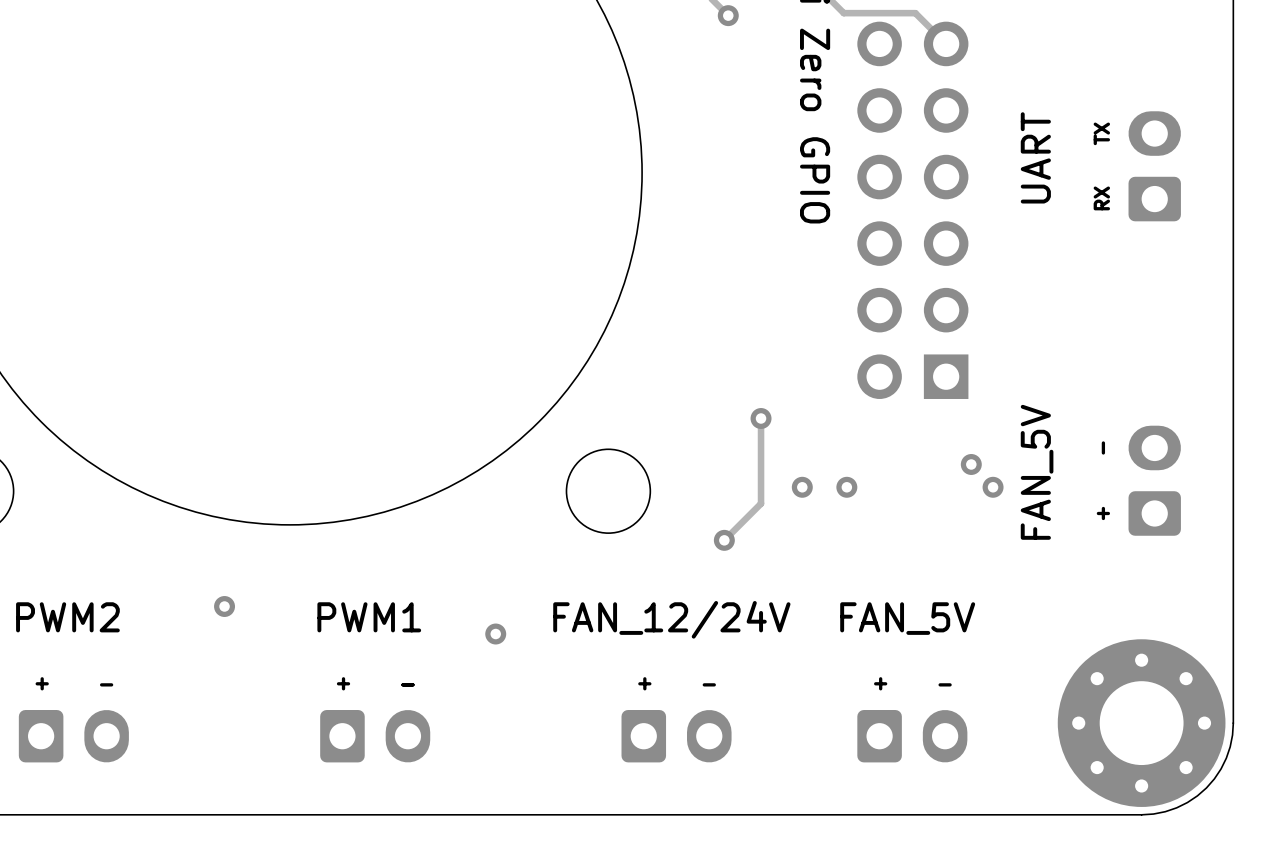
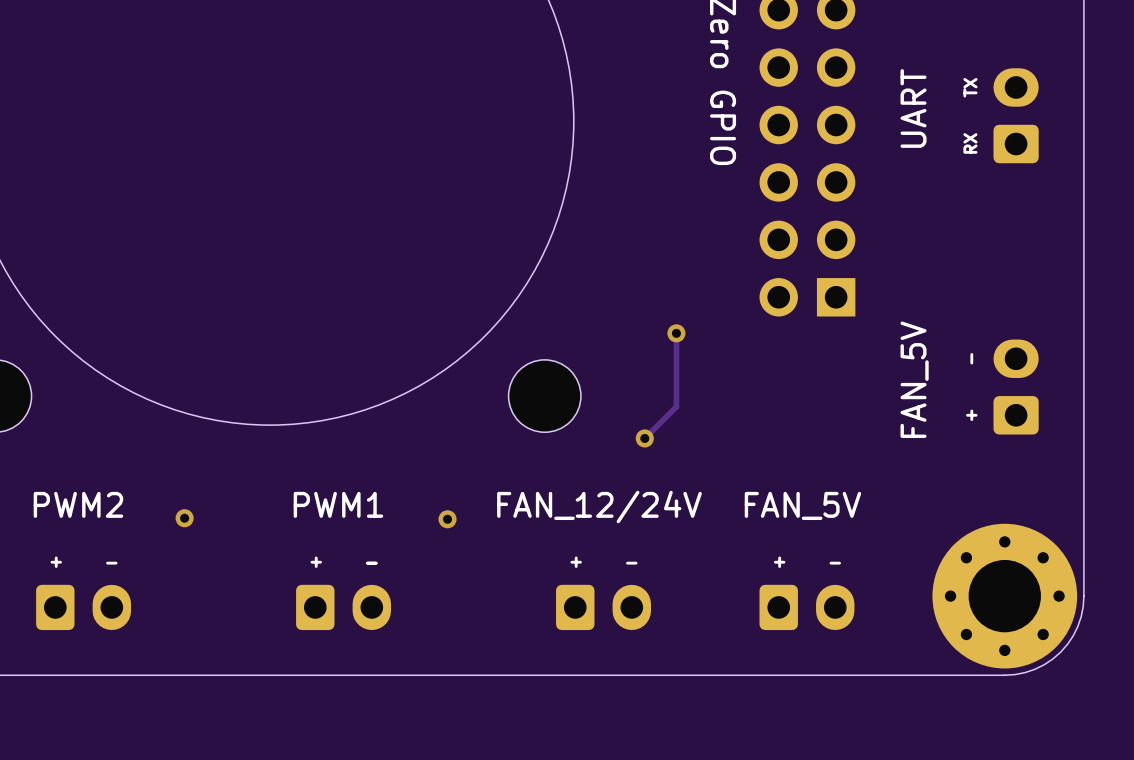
via: (971, 464) -> none
via: (802, 487) -> none
via: (846, 487) -> none
via: (993, 487) -> none
via position: (224, 606) -> (184, 518)

